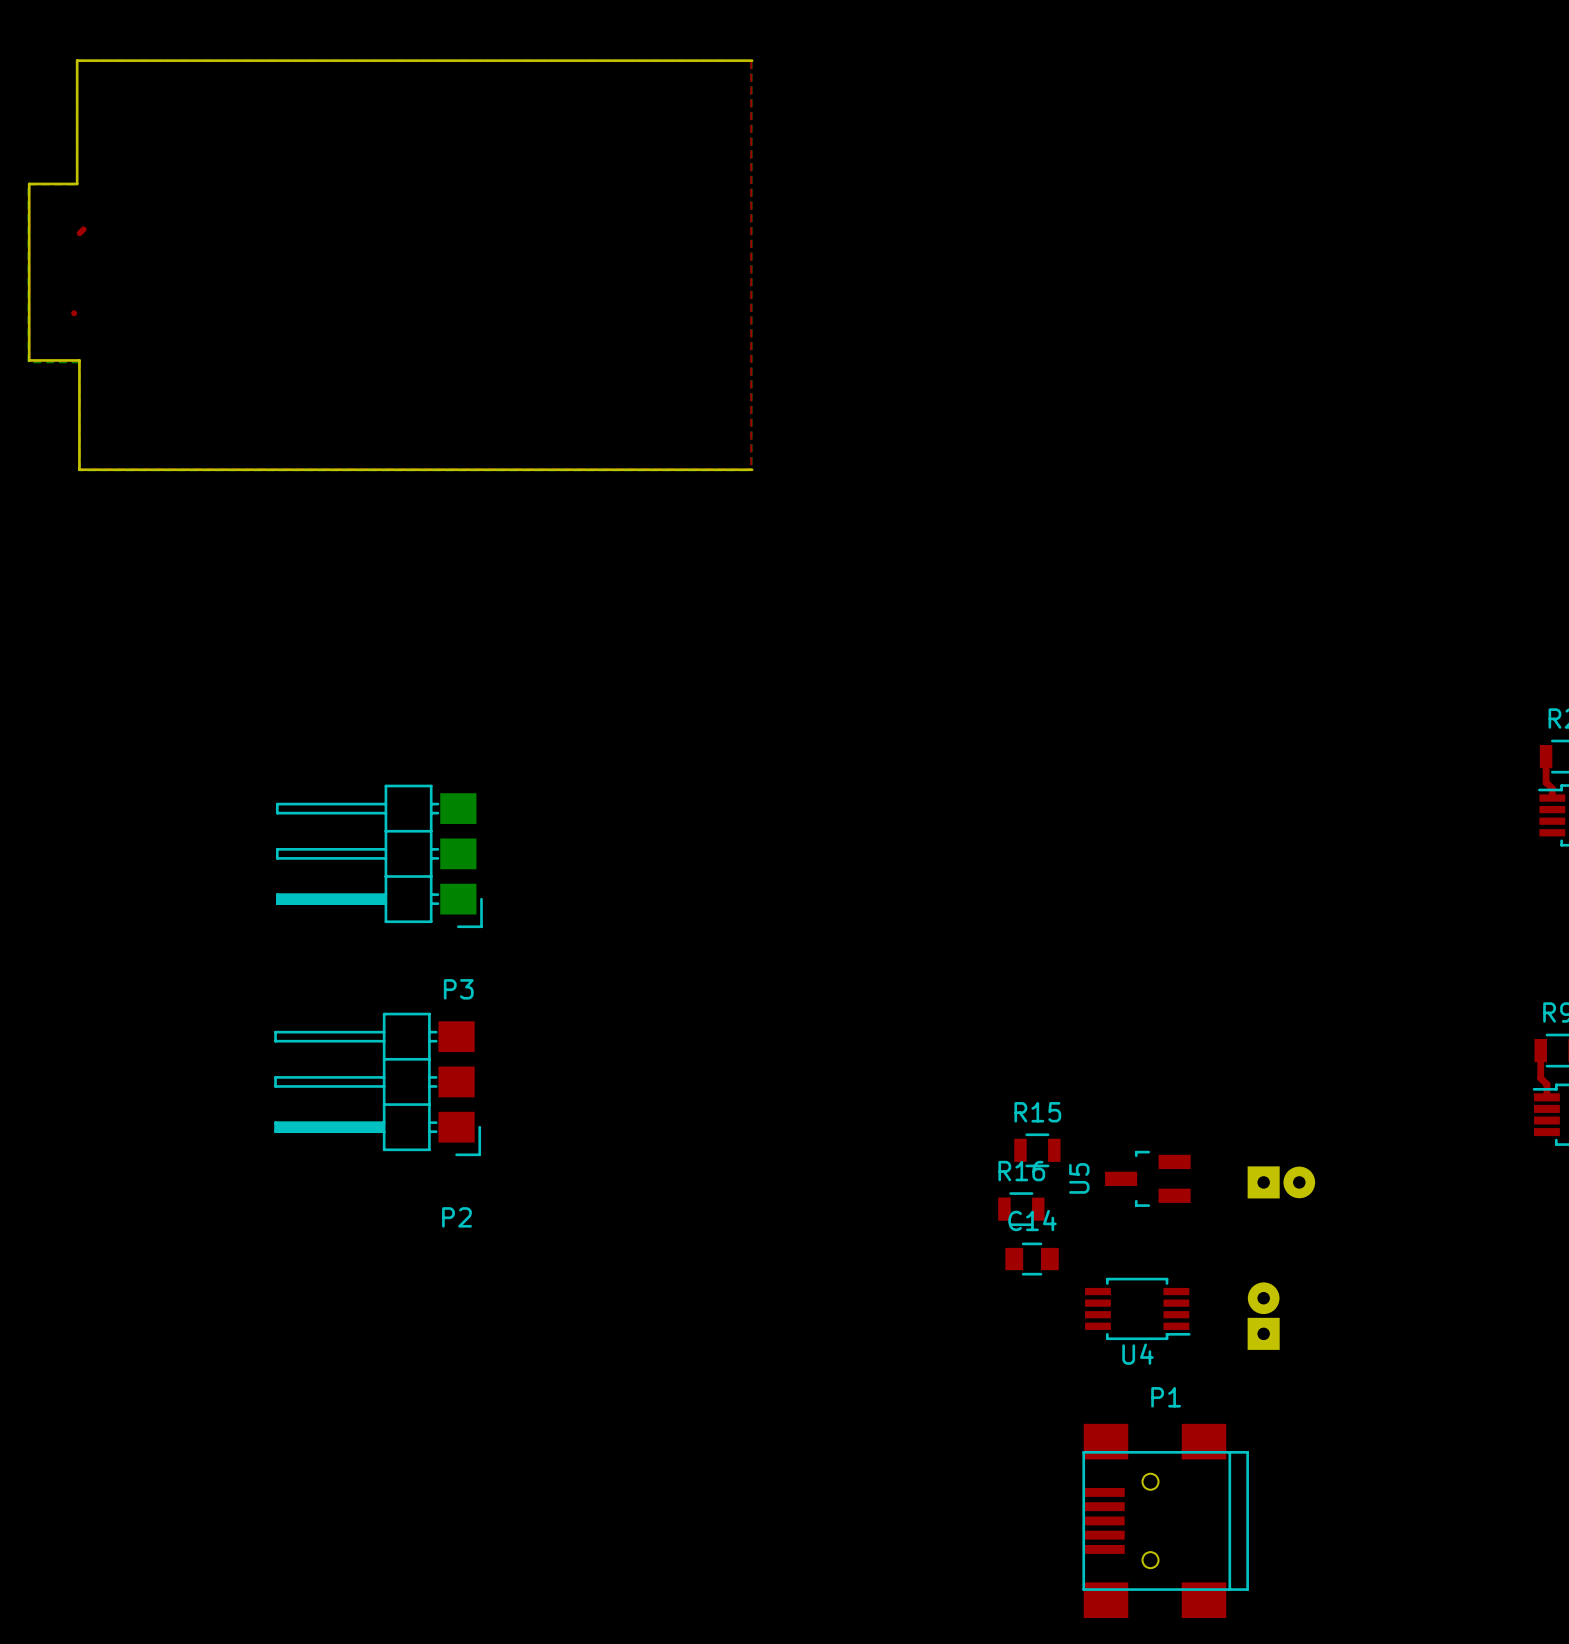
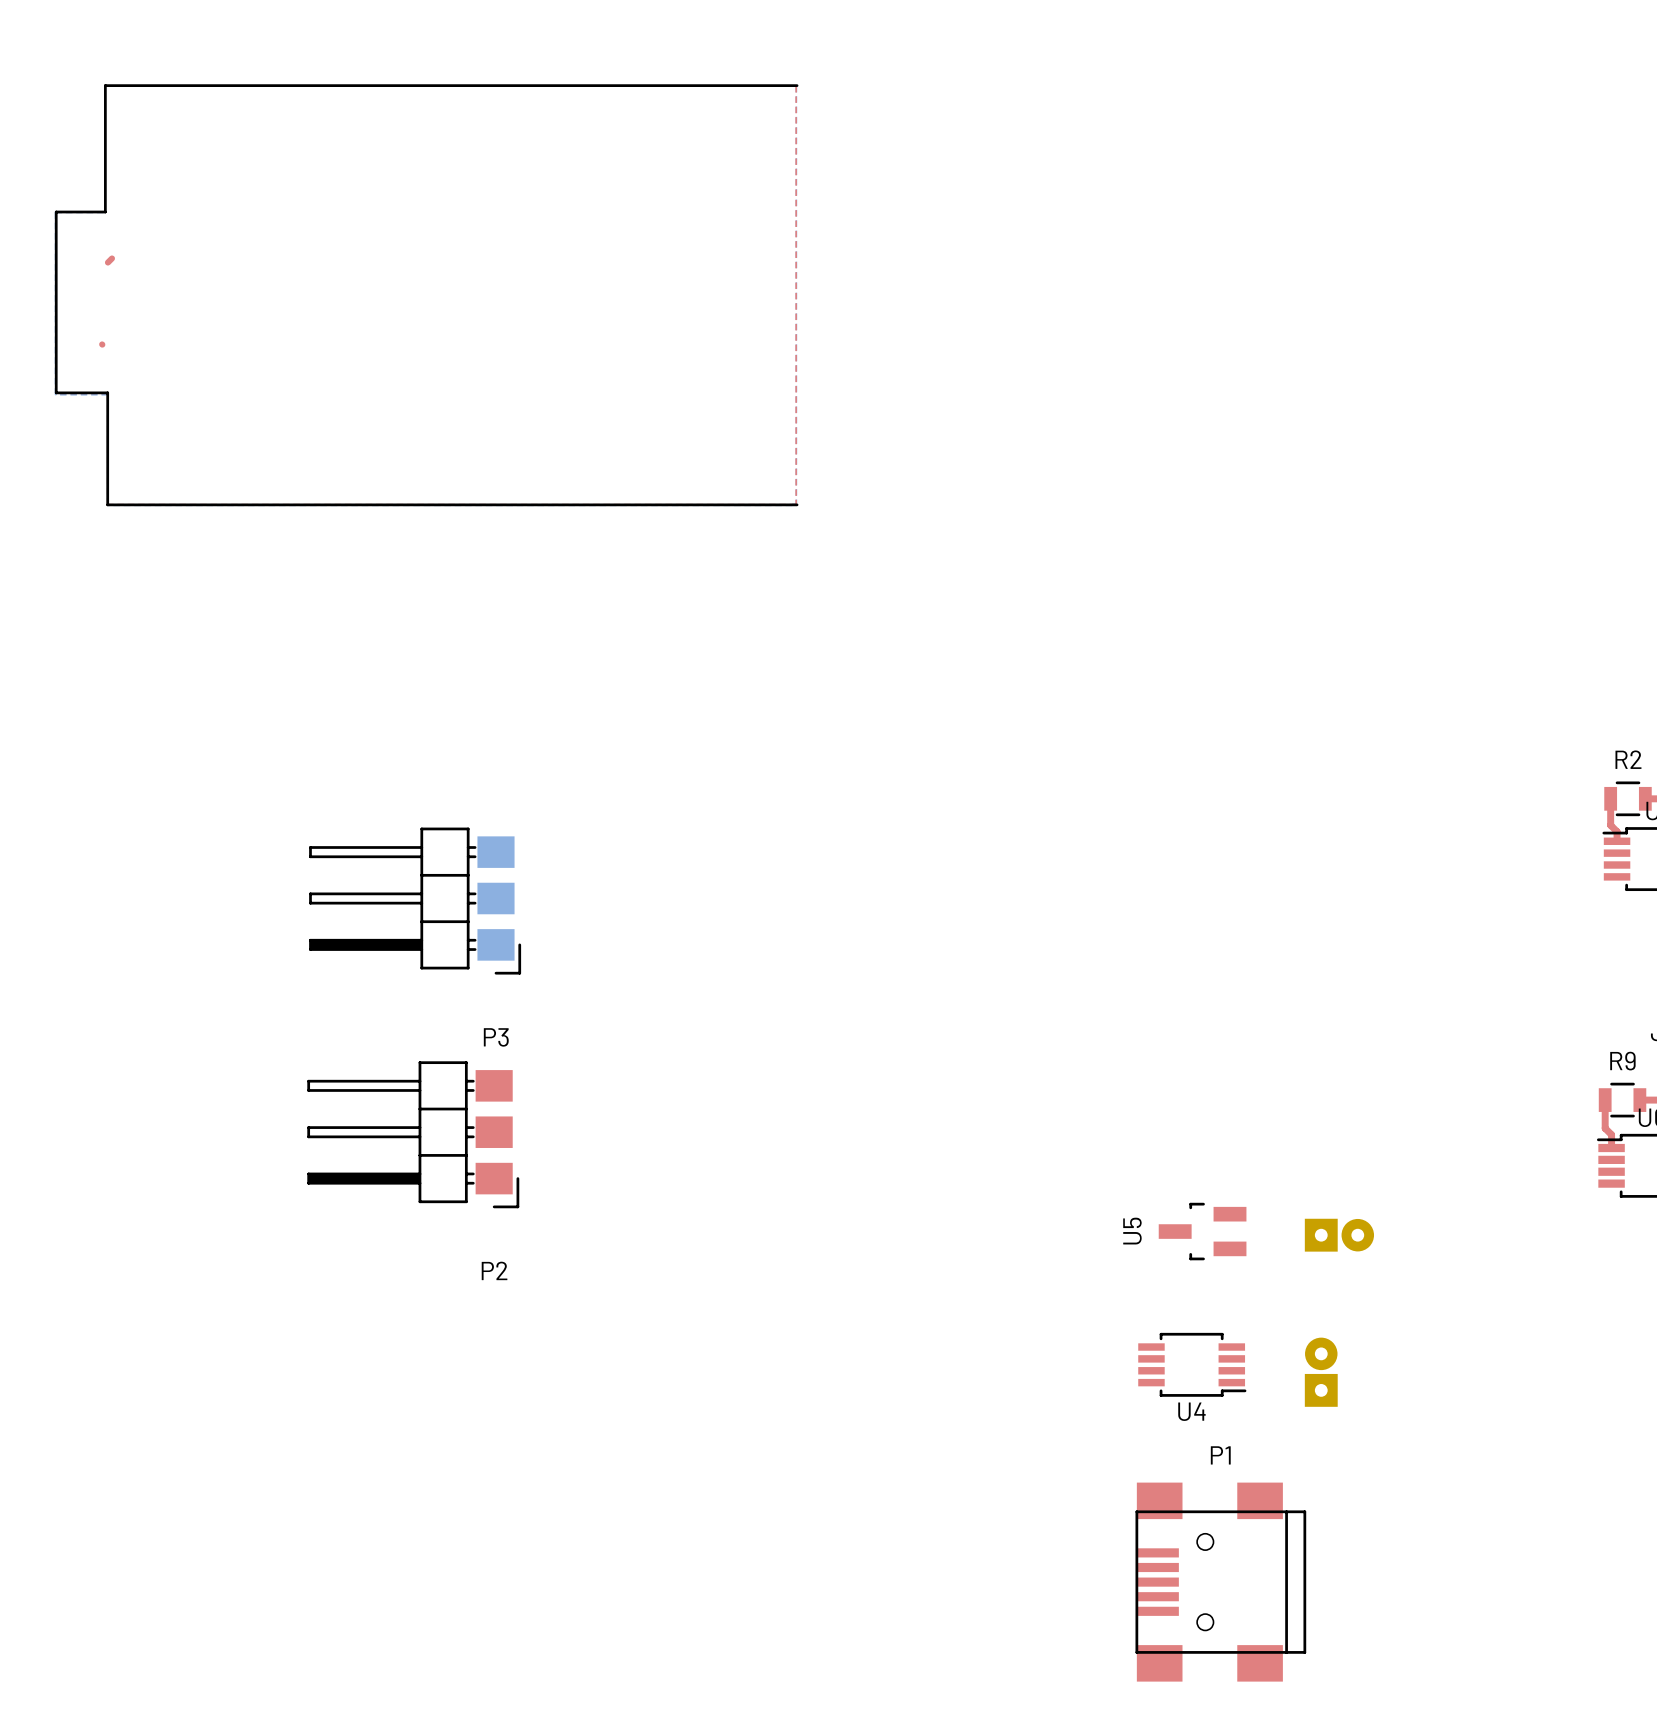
R15: (1037, 1150) -> none
R16: (1021, 1209) -> none
C14: (1032, 1259) -> none

